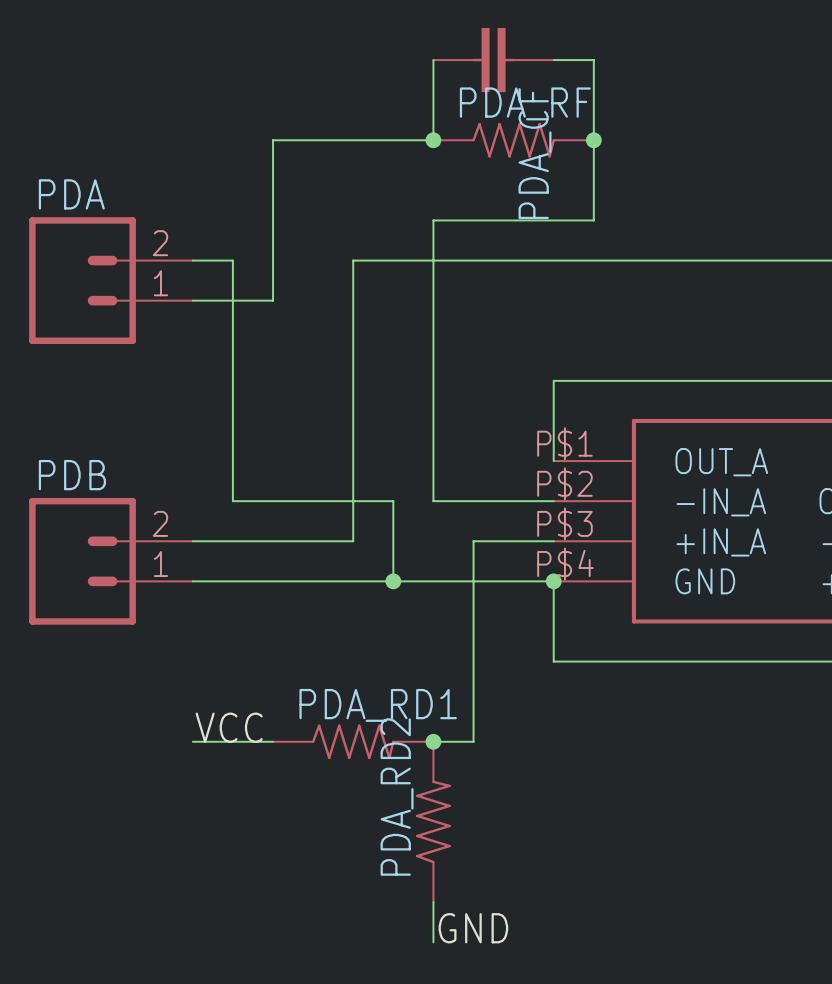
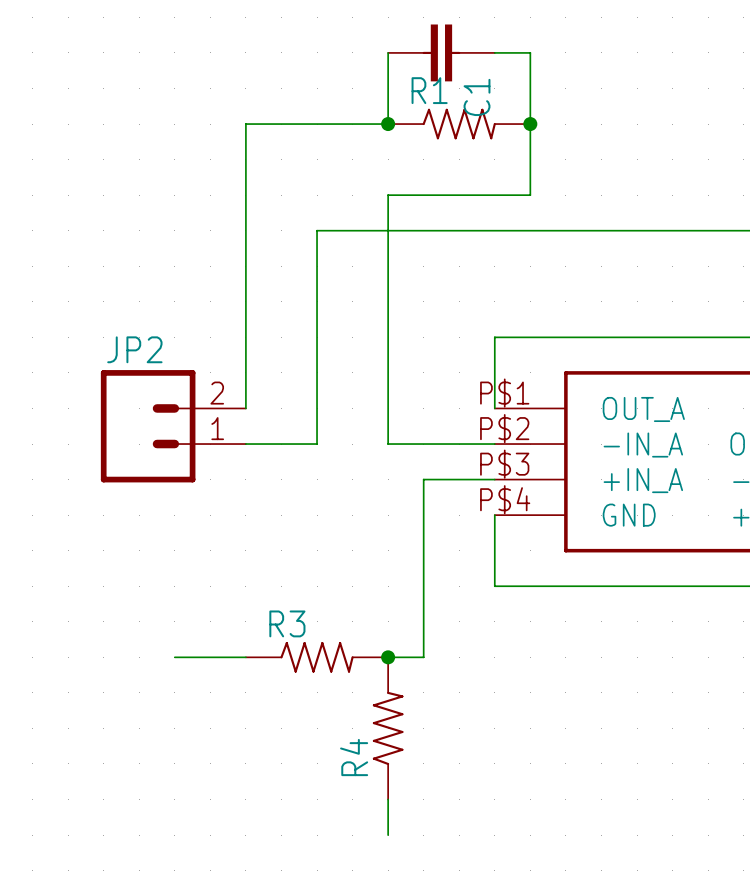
PDA_RF name: PDA_RF (525, 103) -> R1 (429, 90)
PDA_CF name: PDA_CF (535, 153) -> C1 (477, 97)
wire: (192, 260) (232, 260) (232, 501) (273, 501) -> none
PDA: (111, 280) -> none
wire: (192, 300) (273, 300) -> (245, 408) (245, 266)
JP2: none -> (173, 426)
wire: (192, 541) (353, 541) (353, 501) (393, 501) (393, 581) -> none
PDB: (111, 561) -> none
wire: (192, 581) (553, 581) -> none
junction: (393, 581) -> none
junction: (553, 581) -> none
PDA_RD1 name: PDA_RD1 (378, 705) -> R3 (287, 623)
label: VCC (229, 727) -> none
PDA_RD2 name: PDA_RD2 (397, 797) -> R4 (354, 757)
label: GND (473, 928) -> none

